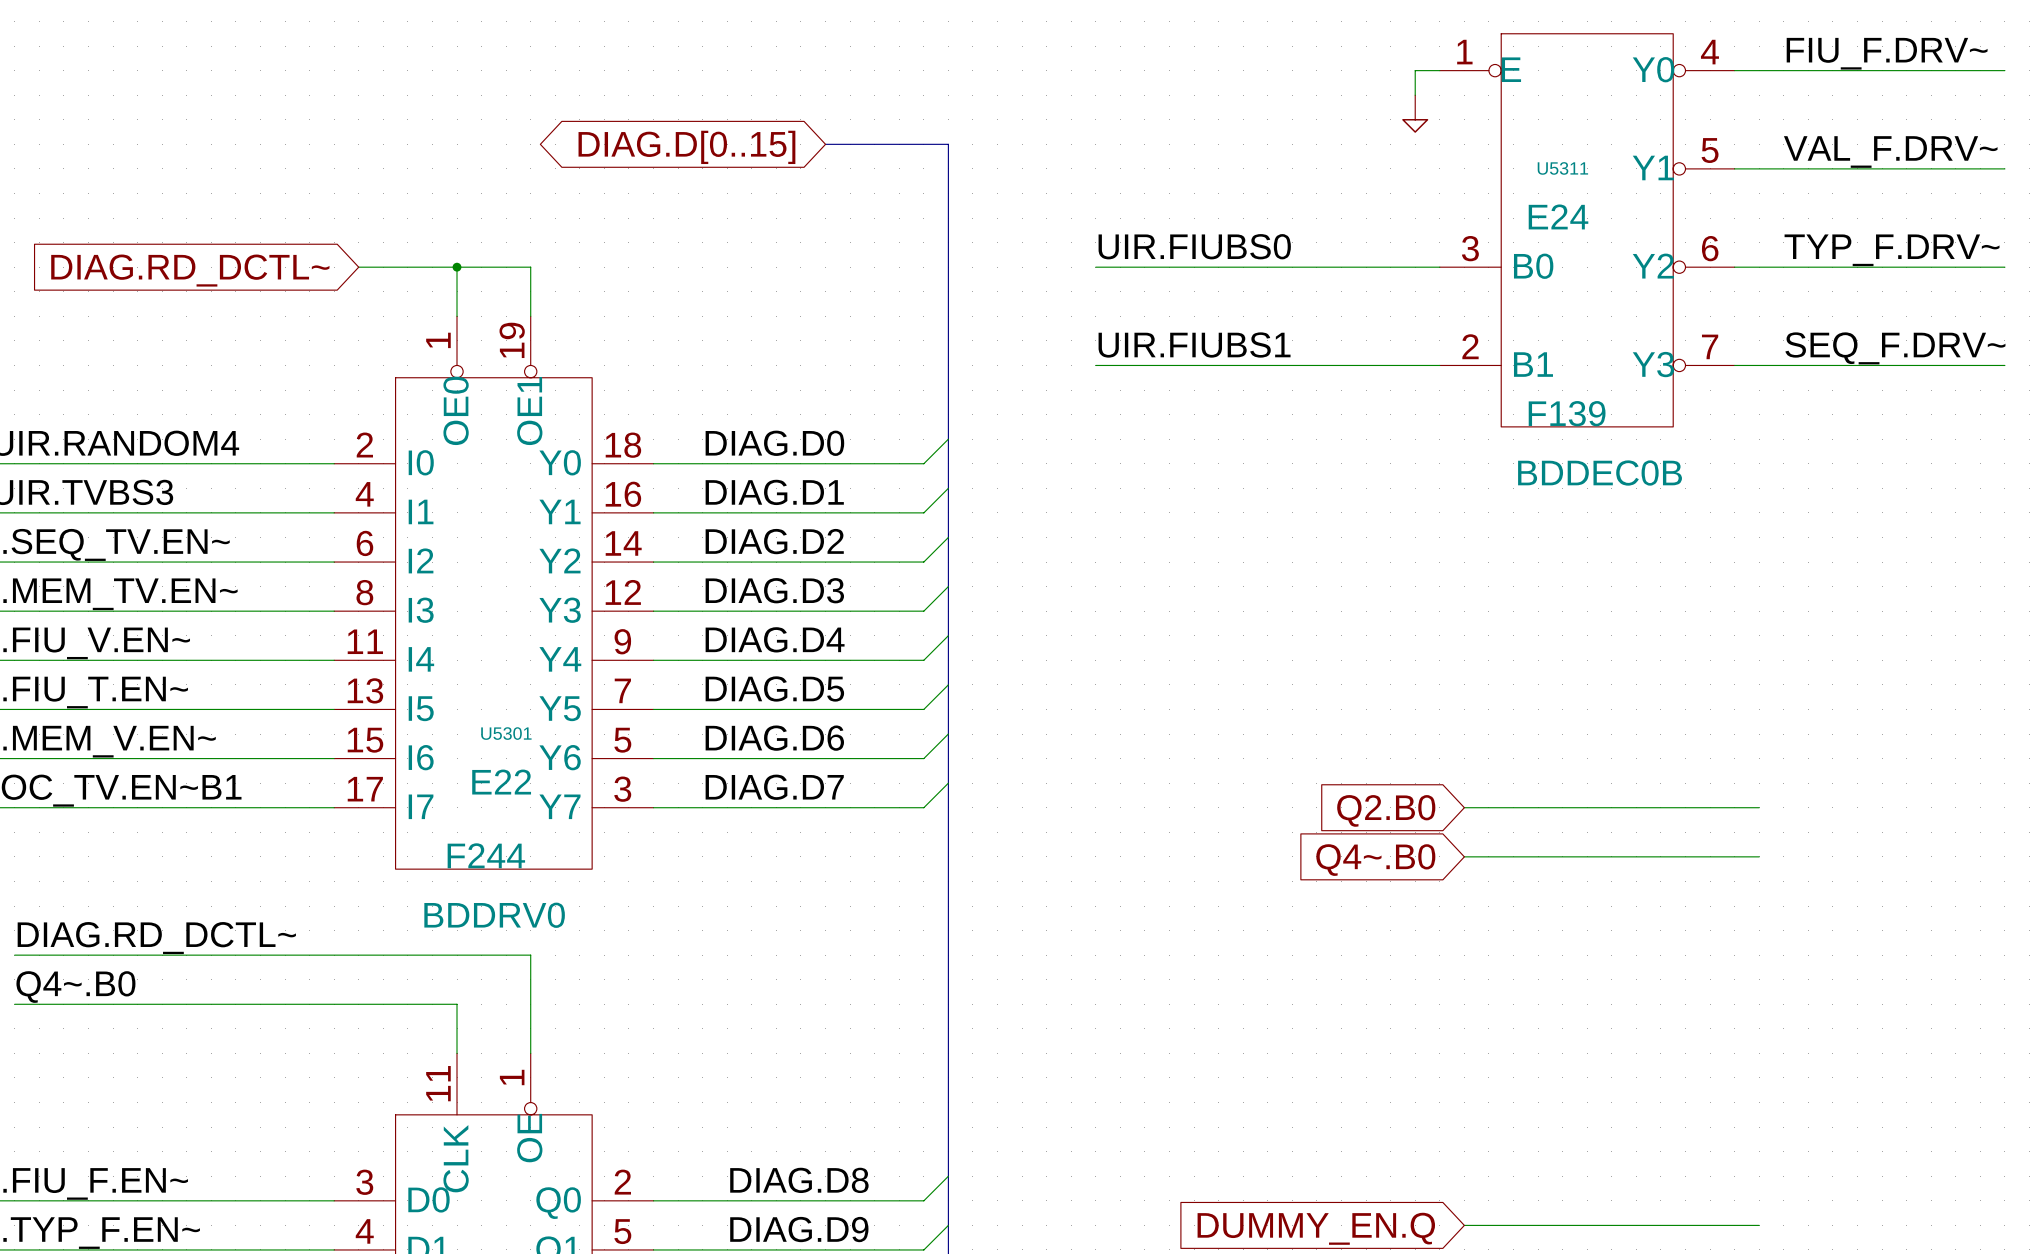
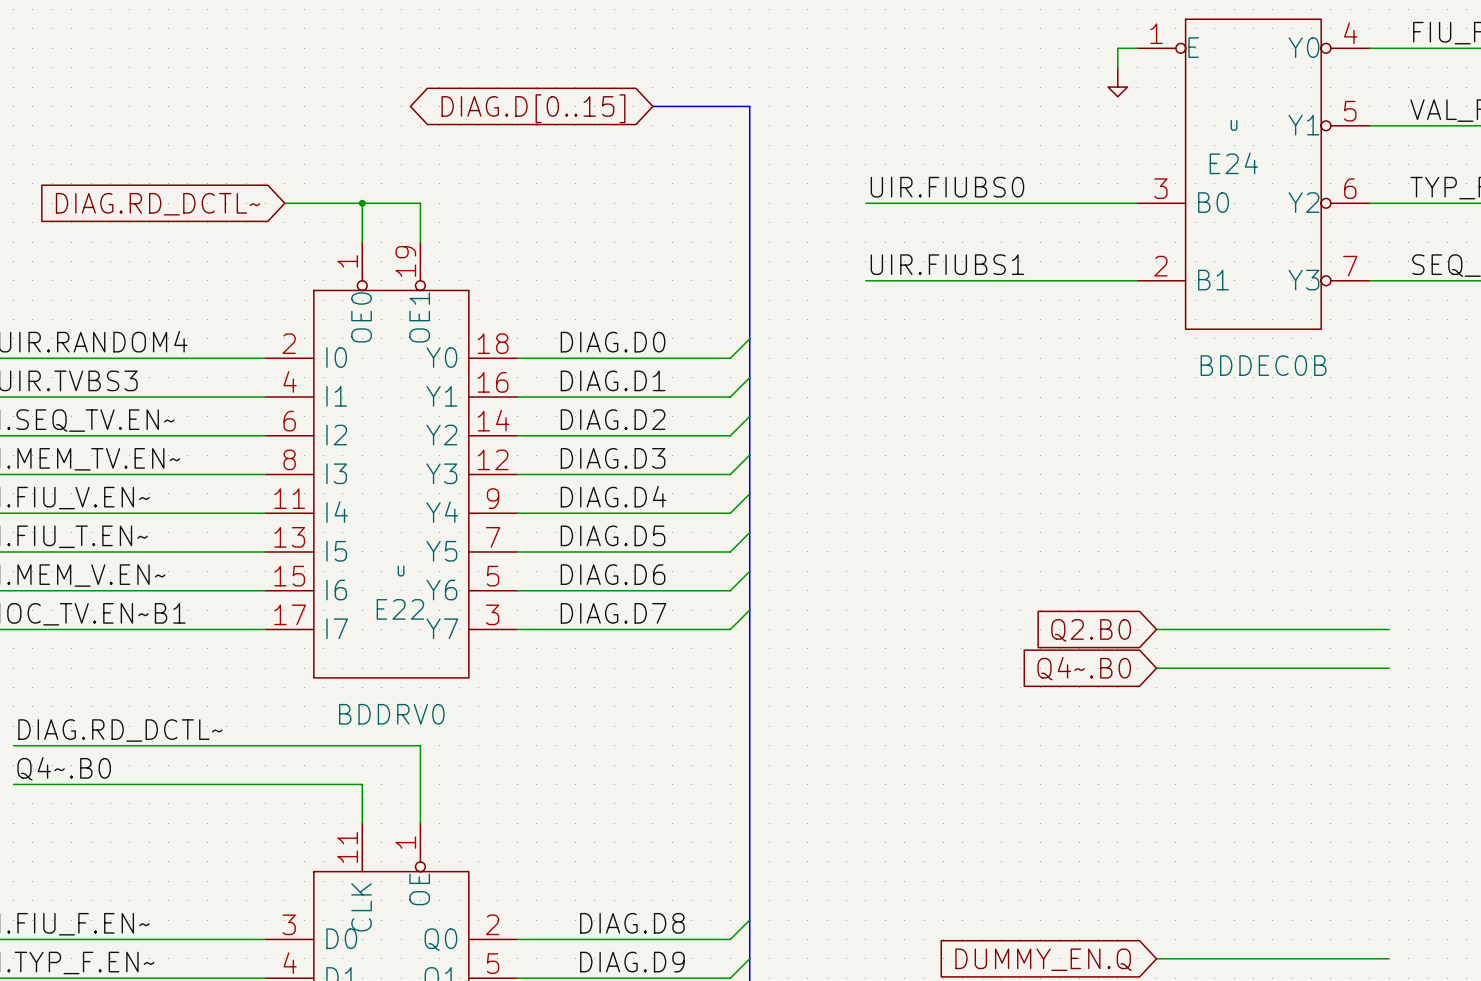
U5311 name: U5311 (1562, 168) -> U (1234, 125)
U5311 value: F139 (1567, 413) -> none
U5301 name: U5301 (506, 733) -> U (401, 571)
U5301 value: F244 (486, 855) -> none

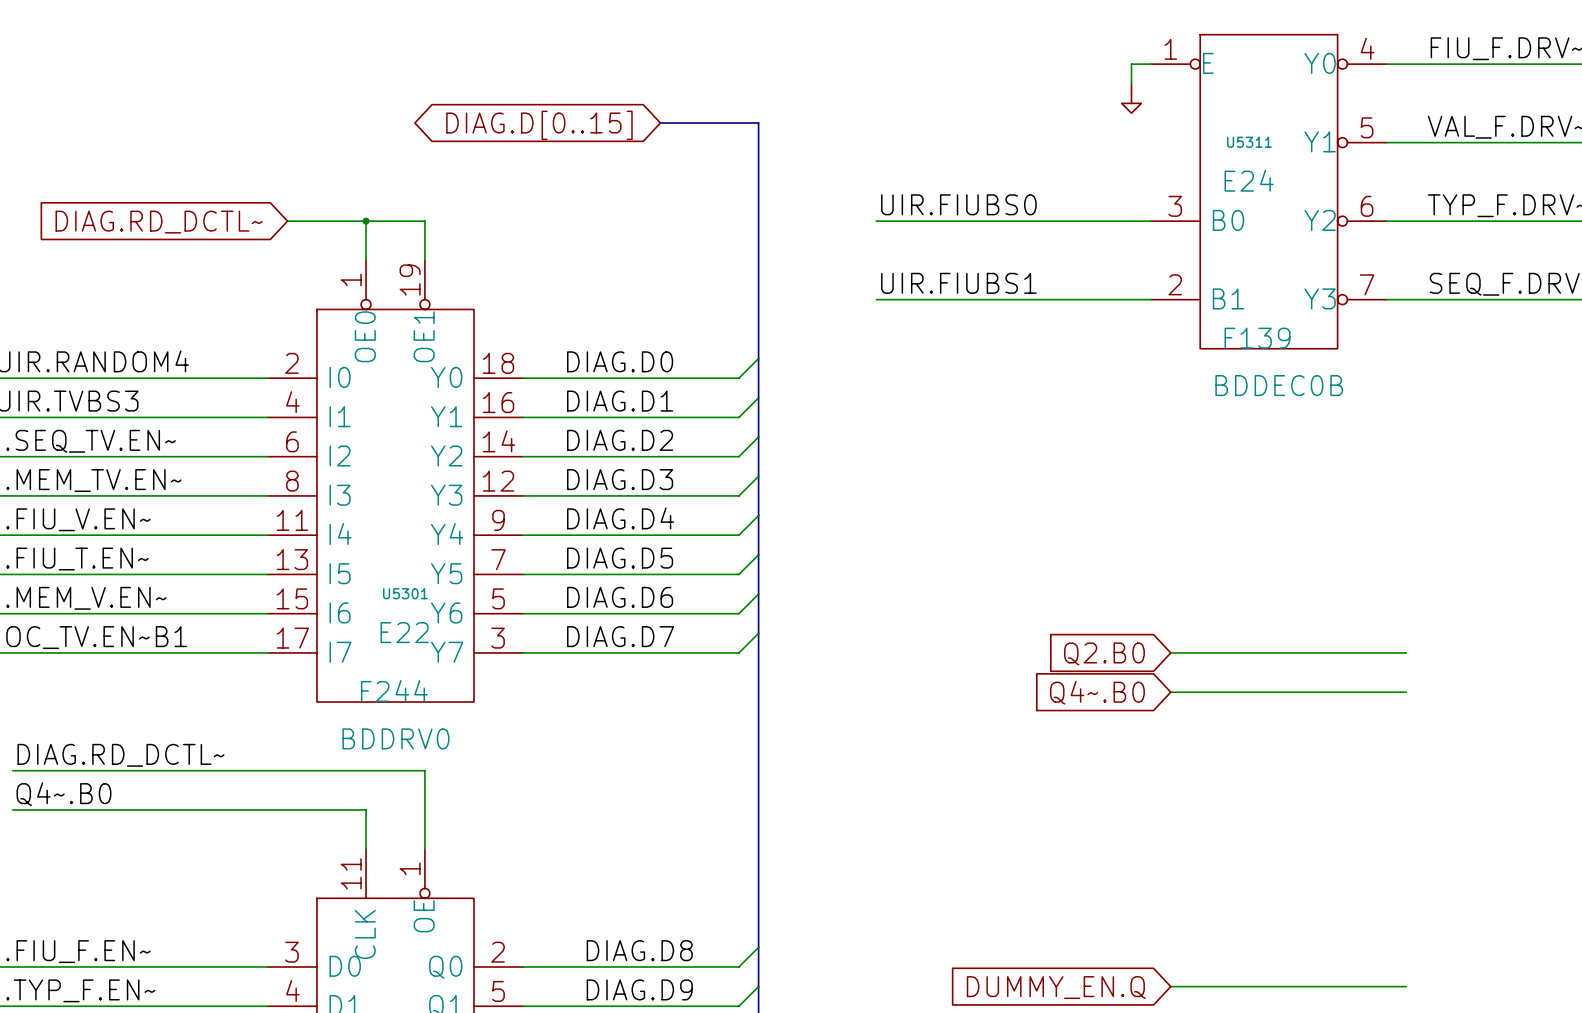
U name: U (1234, 125) -> U5311 (1249, 142)
U value: none -> F139 (1257, 338)
U name: U (401, 571) -> U5301 (405, 593)
U value: none -> F244 (394, 691)

